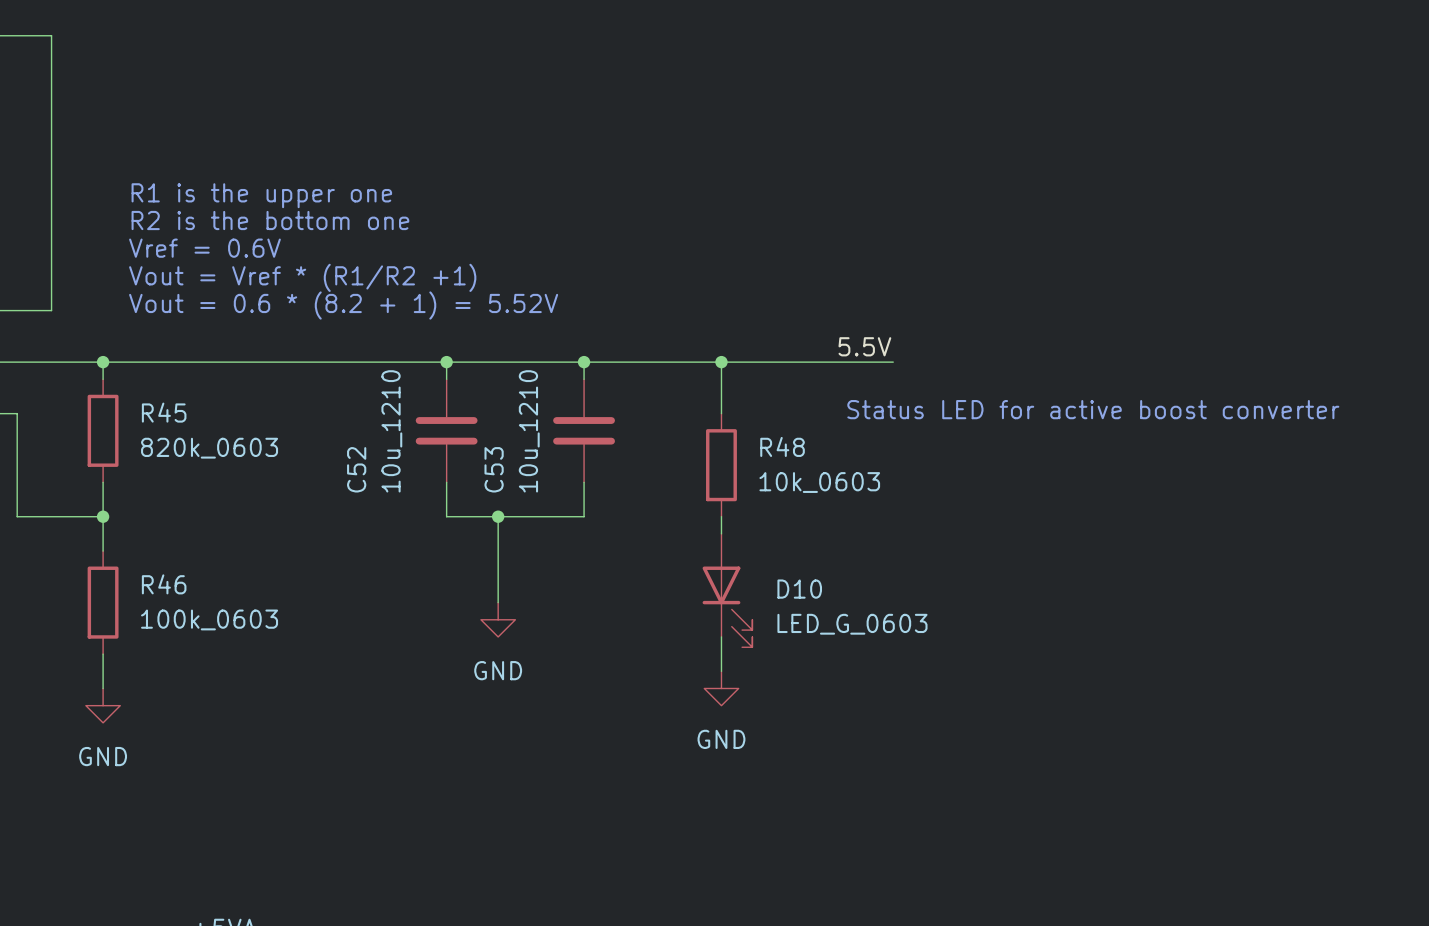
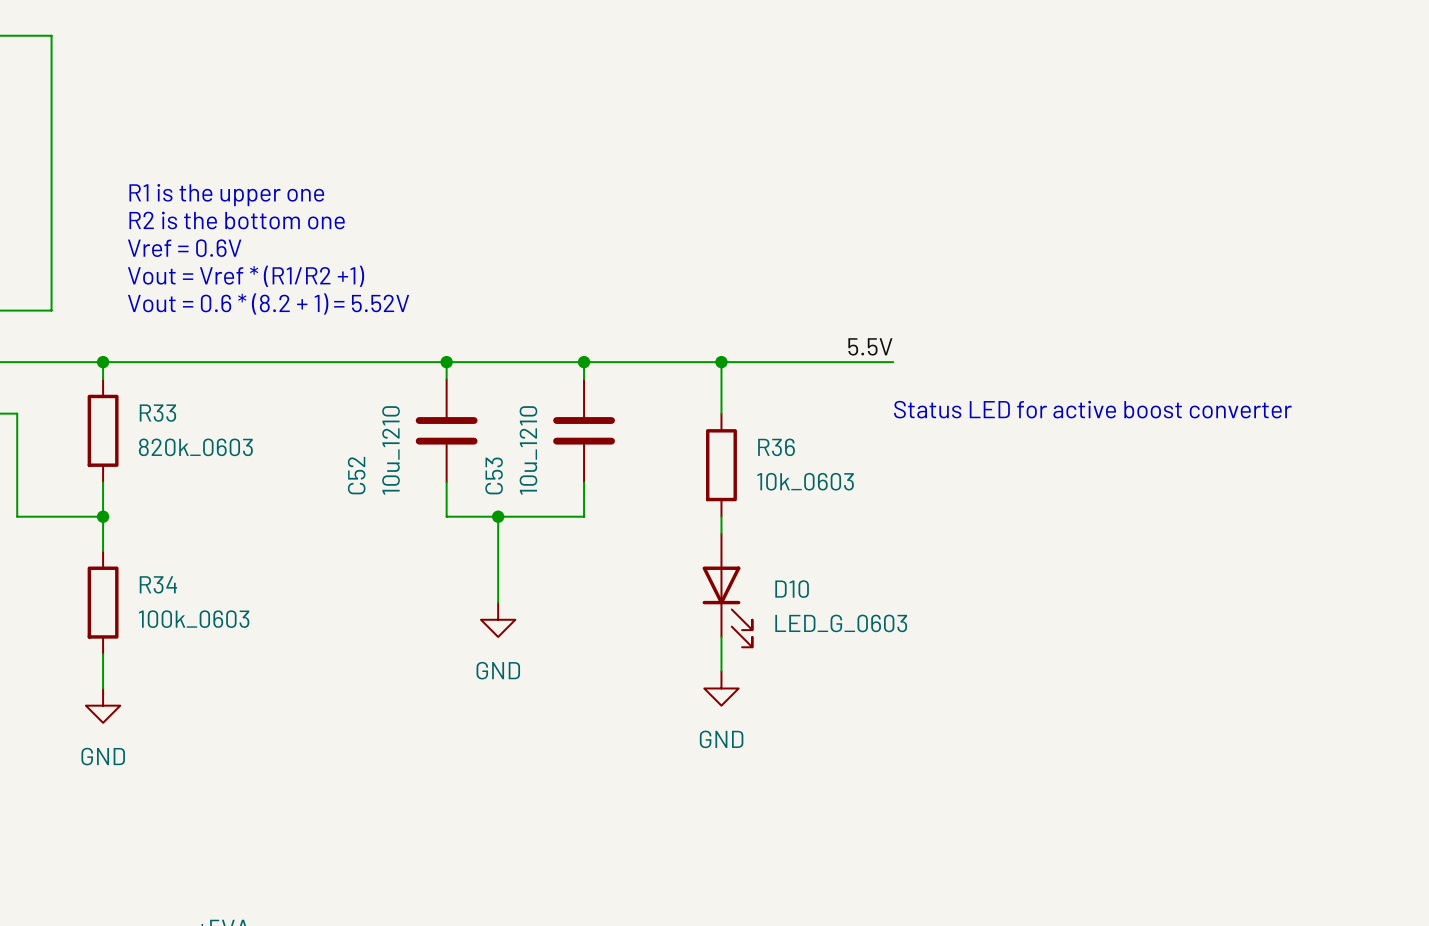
R45 name: R45 (164, 412) -> R33 (157, 413)
R48 name: R48 (782, 446) -> R36 (776, 447)
R46 name: R46 (164, 584) -> R34 (158, 584)

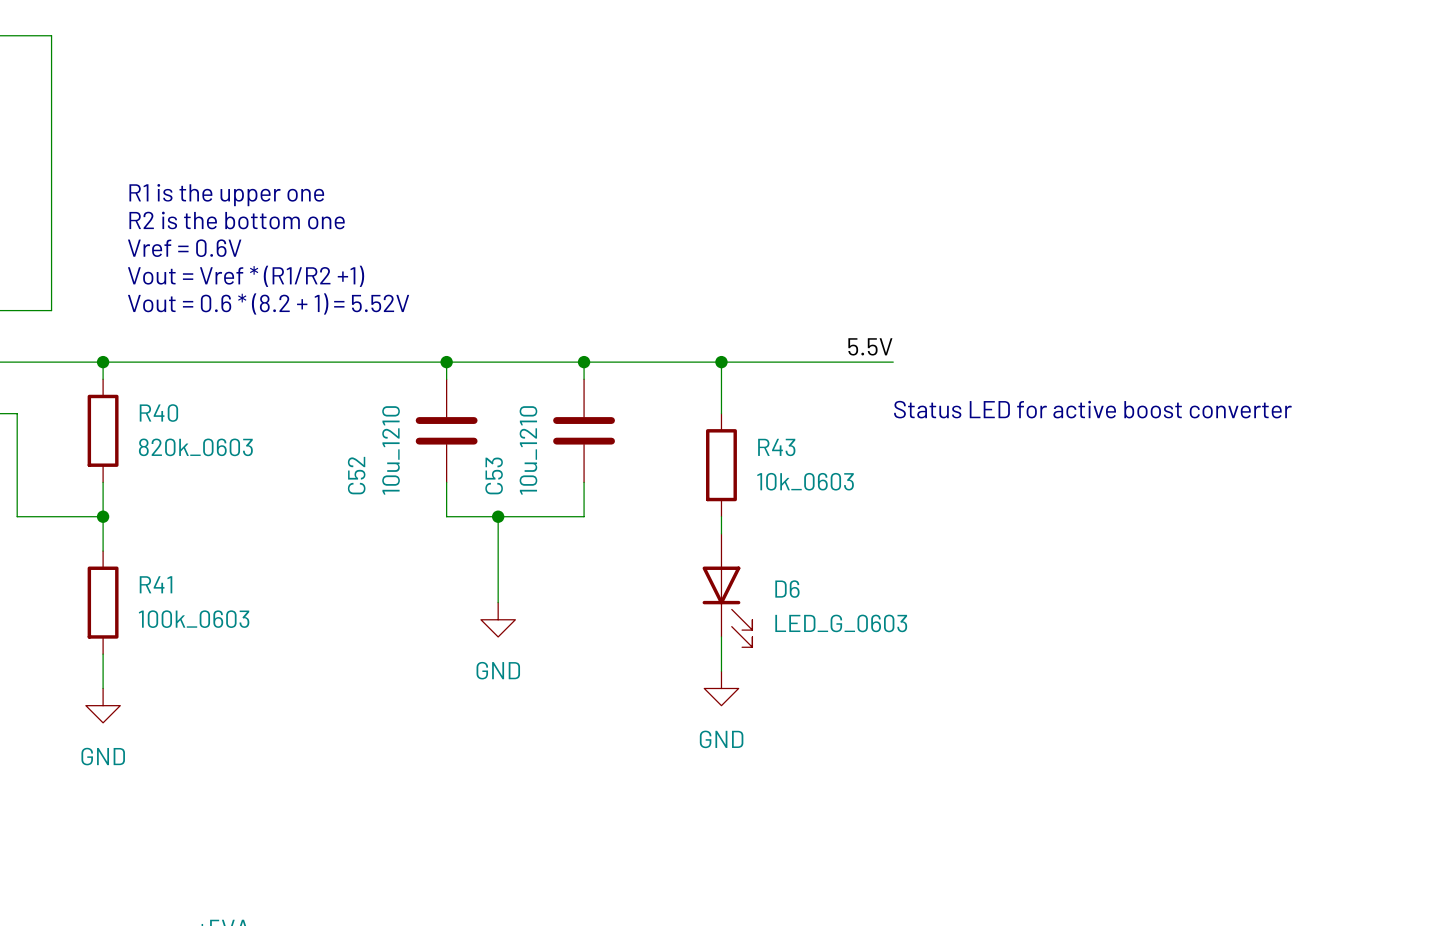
R33 name: R33 (157, 413) -> R40 (158, 413)
R36 name: R36 (776, 447) -> R43 (776, 447)
R34 name: R34 (158, 584) -> R41 (156, 584)
D10 name: D10 (792, 589) -> D6 (787, 589)

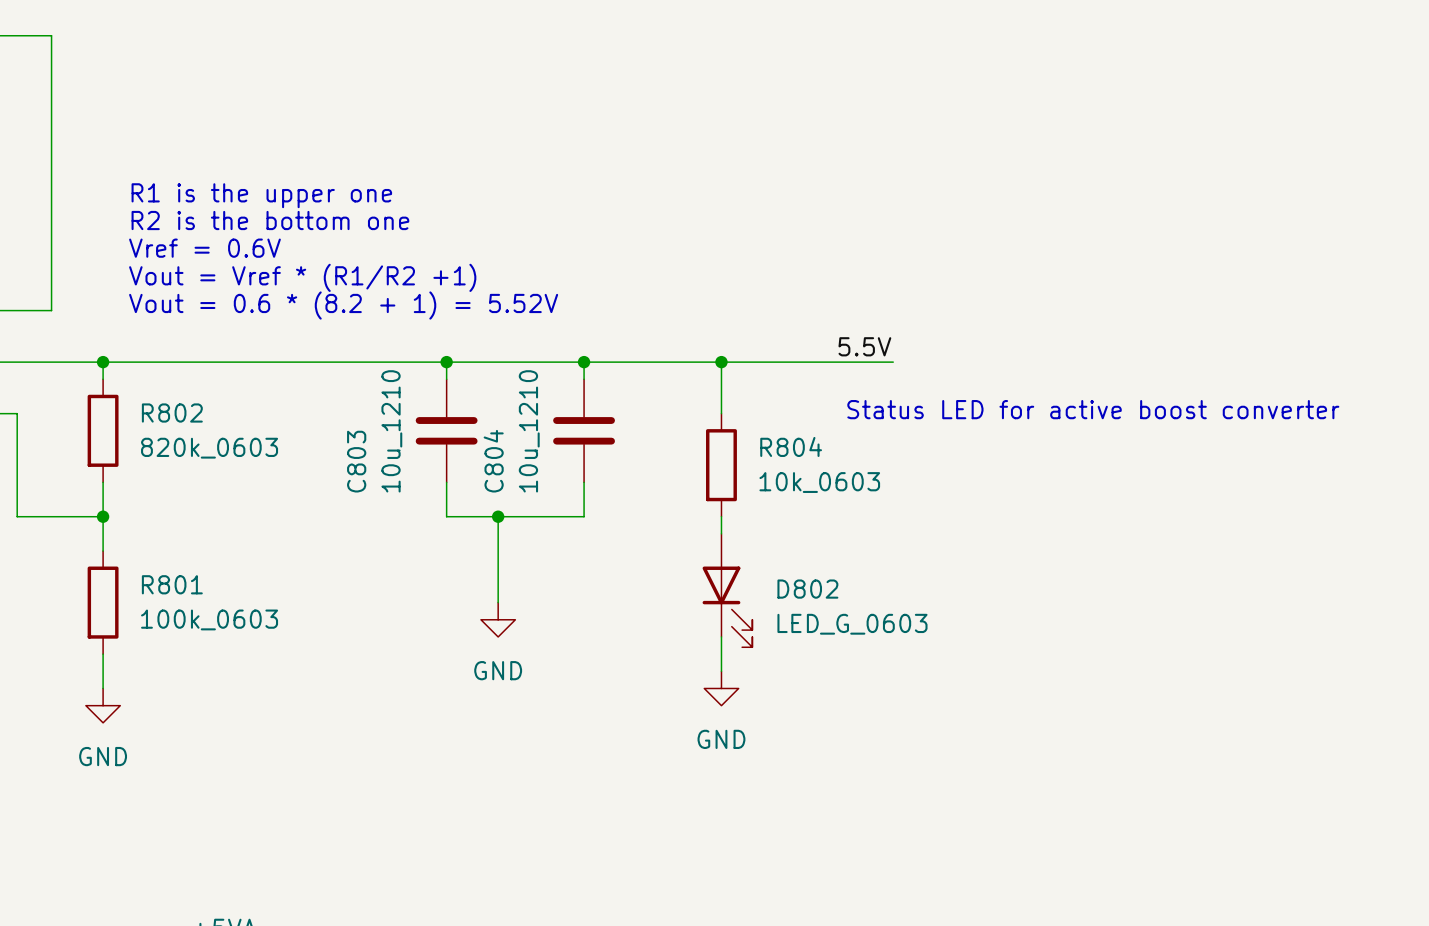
R40 name: R40 (158, 413) -> R802 (172, 413)
R43 name: R43 (776, 447) -> R804 (791, 446)
C52 name: C52 (356, 475) -> C803 (356, 461)
C53 name: C53 (494, 475) -> C804 (493, 461)
R41 name: R41 (156, 584) -> R801 (172, 584)
D6 name: D6 (787, 589) -> D802 (807, 589)

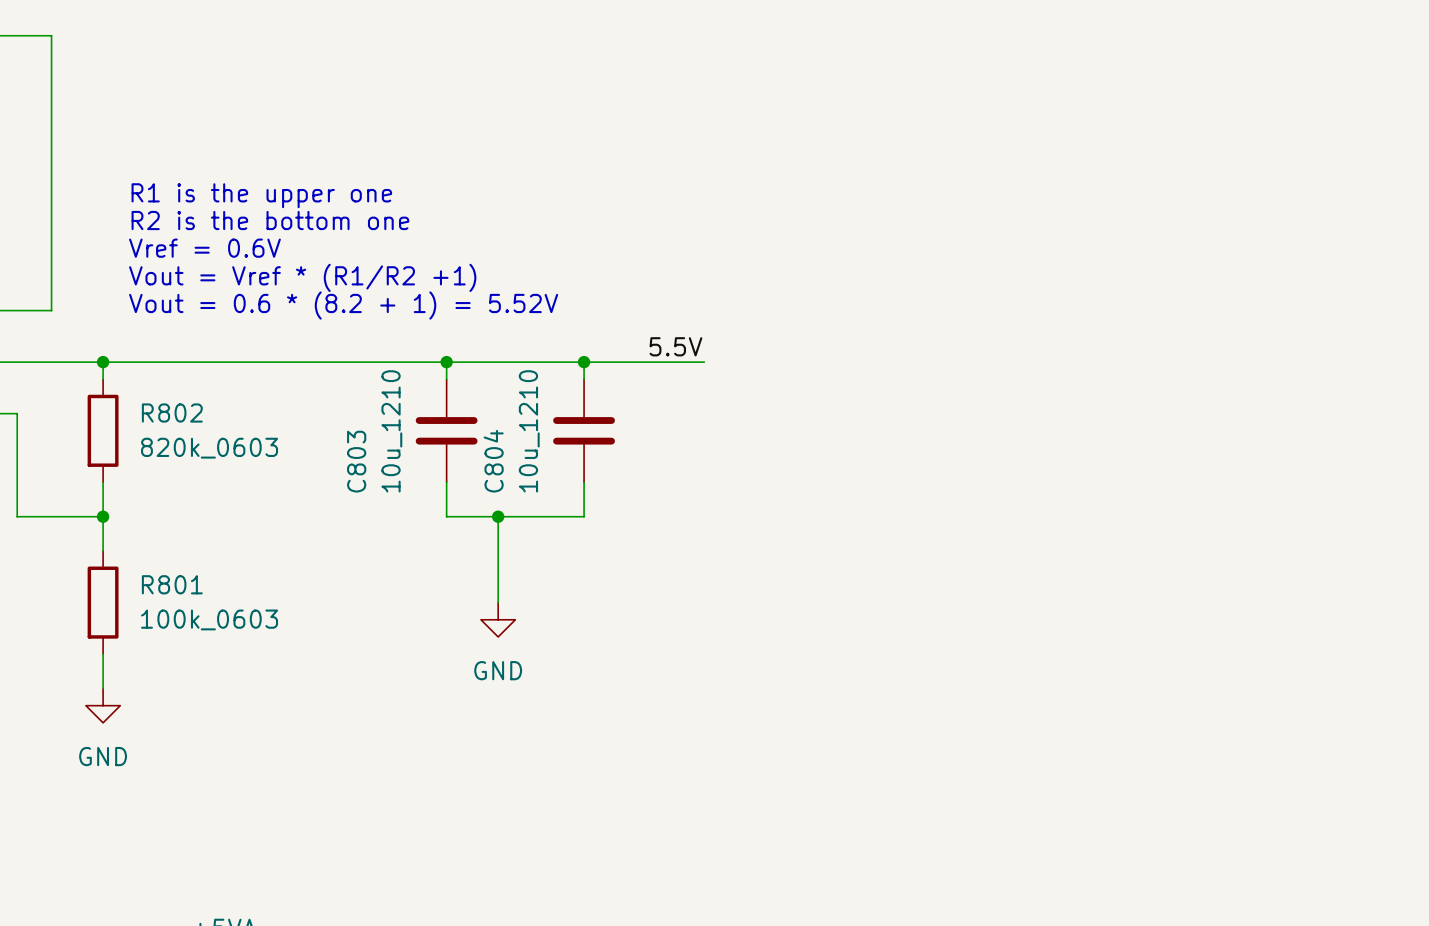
label position: 5.5V (864, 346) -> 5.5V (675, 346)
wire: (704, 362) (893, 362) -> none
wire: (721, 362) (721, 413) -> none
junction: (721, 362) -> none
text: Status LED for active boost converter (1093, 409) -> none
R804: 10k_0603 (721, 465) -> none
wire: (721, 516) (721, 533) -> none
D802: LED_G_0603 (727, 590) -> none
wire: (721, 636) (721, 671) -> none
power symbol: GND (721, 688) -> none

